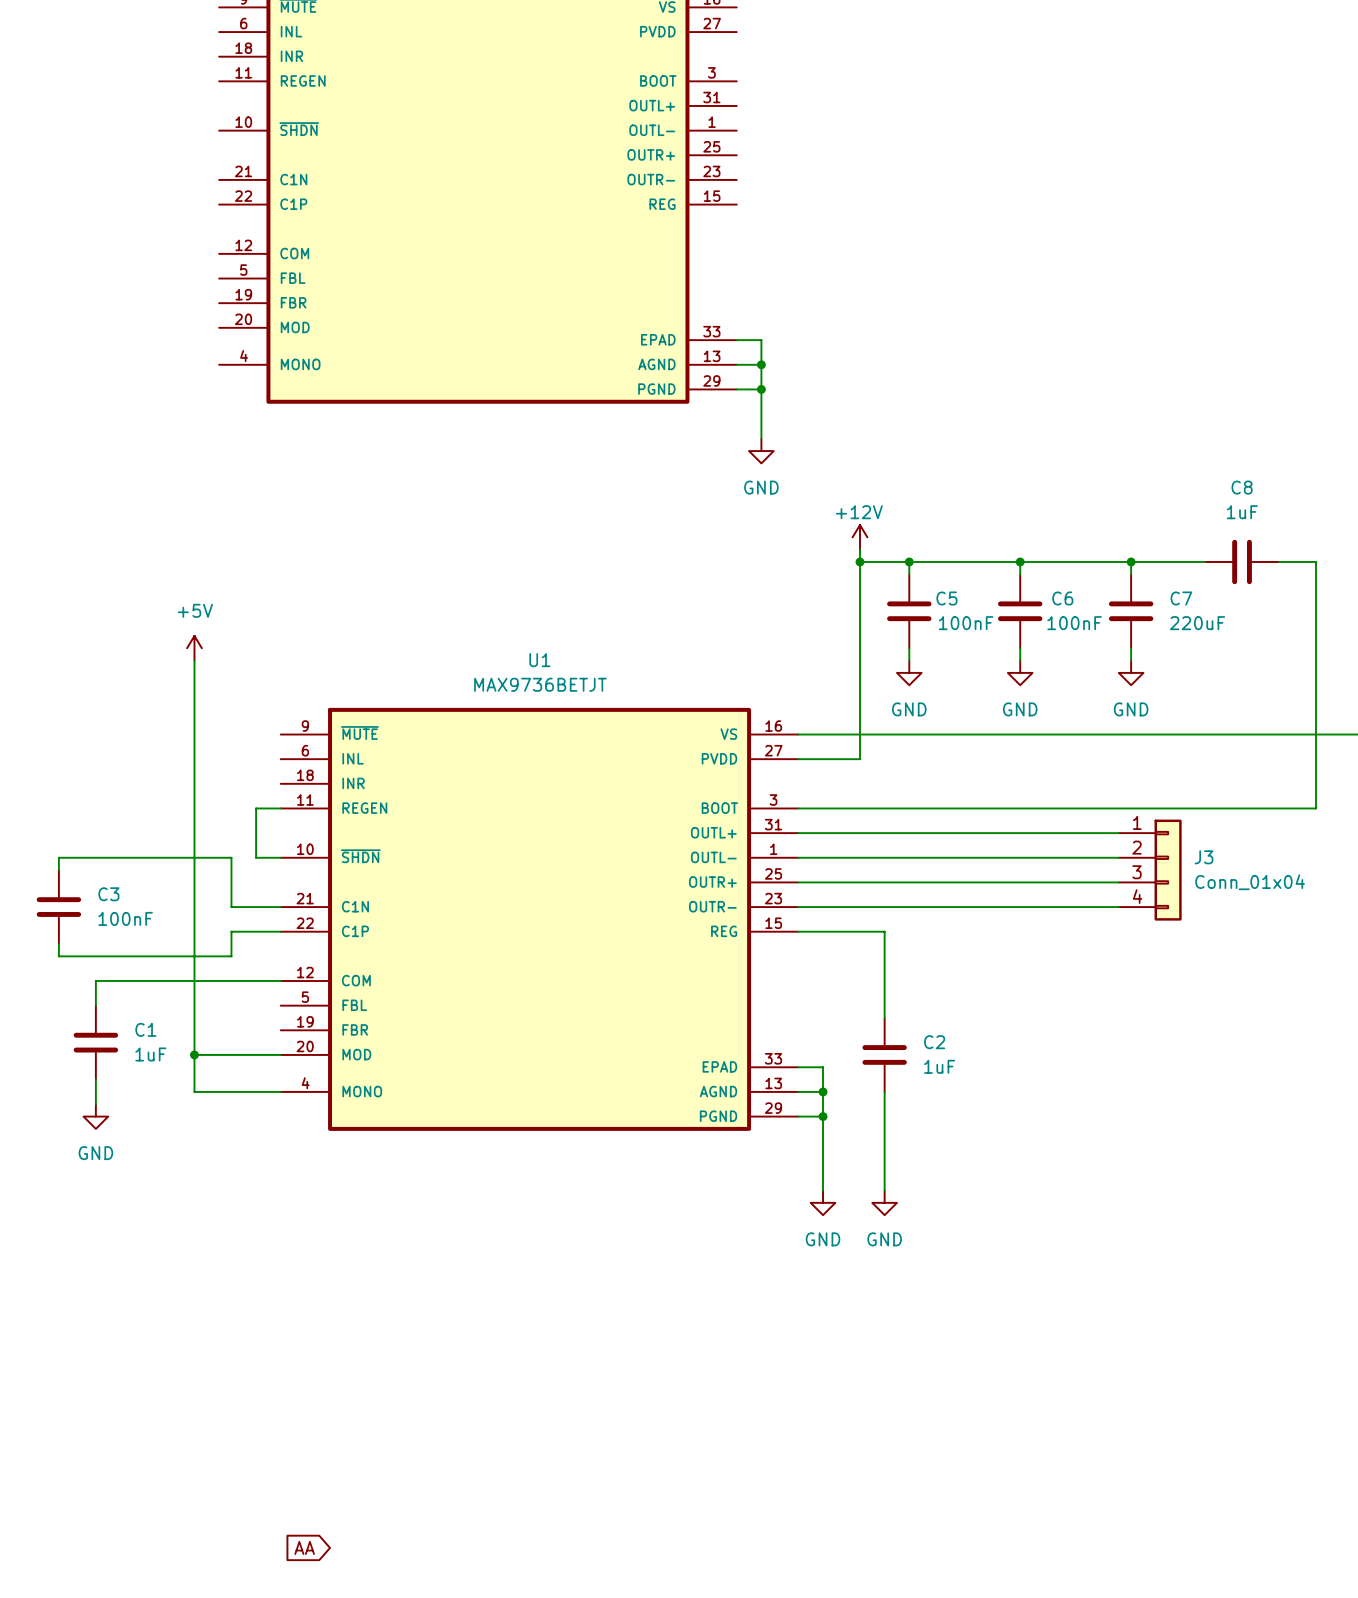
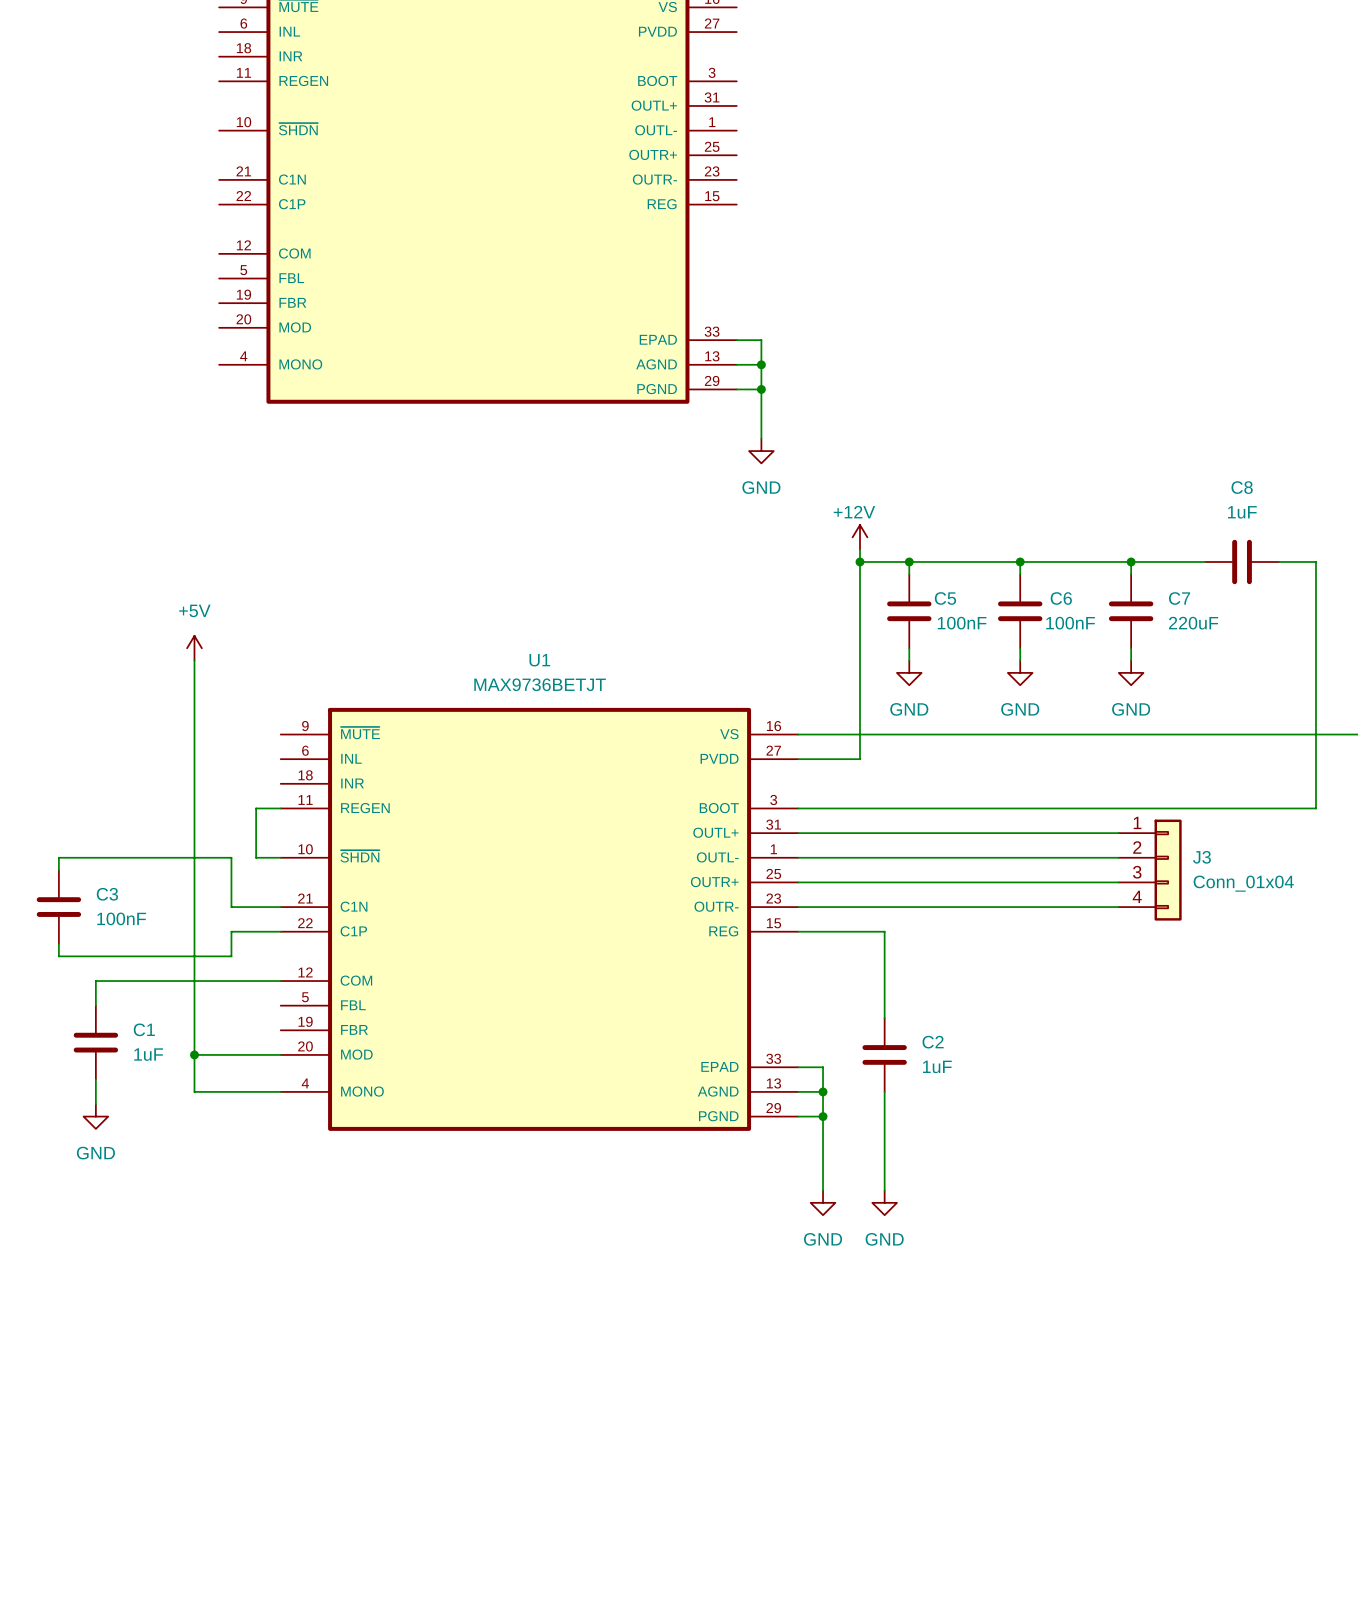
global label: AA (304, 1547) -> none

